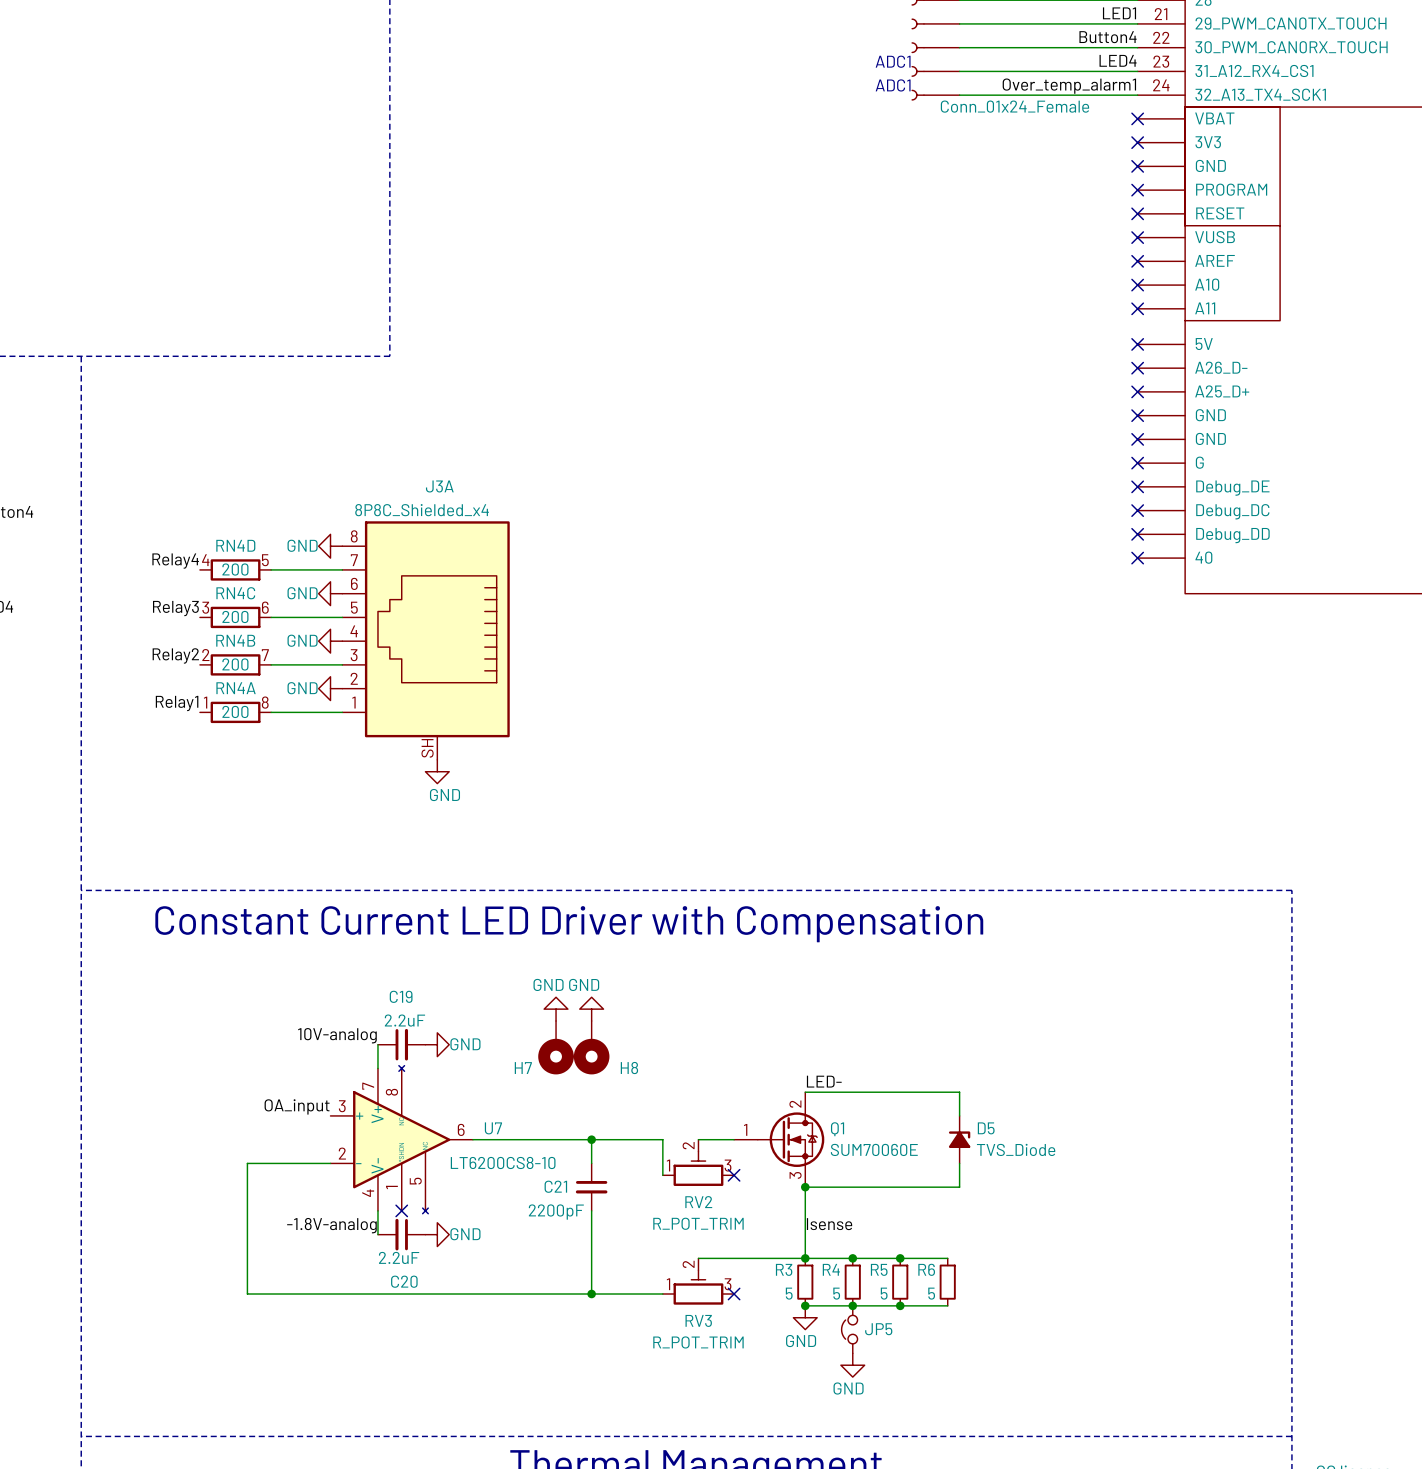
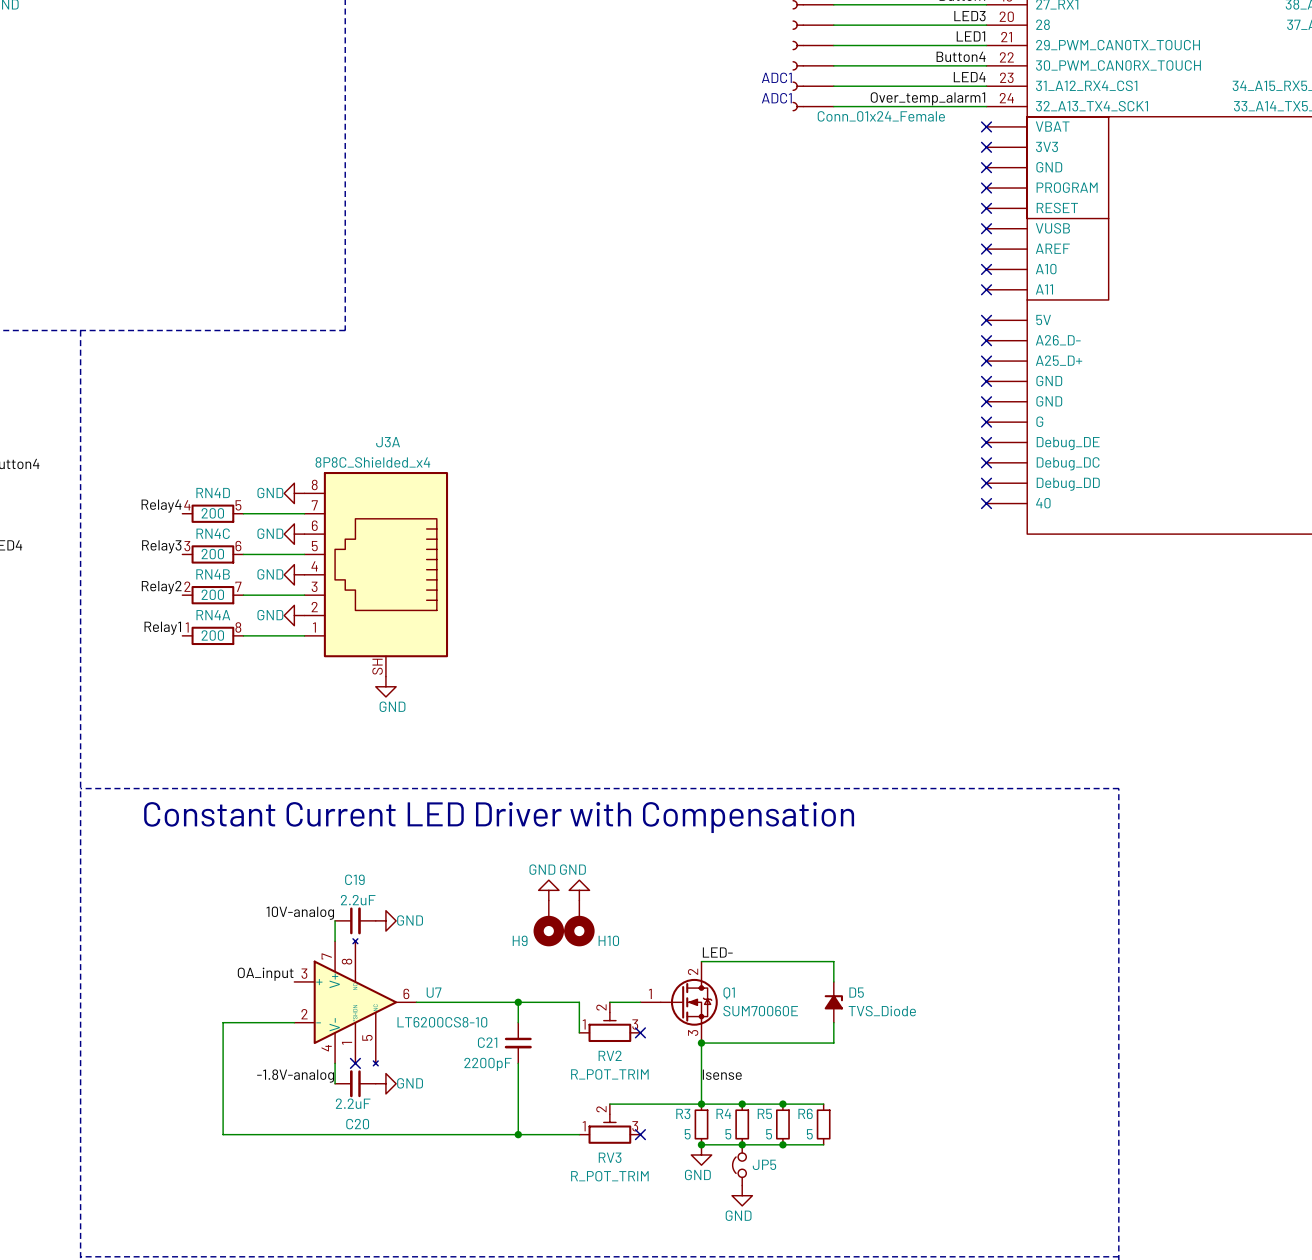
power symbol: GND (556, 1009) -> none
power symbol: GND (591, 1009) -> none
power symbol: none -> GND (548, 890)
power symbol: none -> GND (579, 890)
H7: (556, 1047) -> none
H8: (591, 1047) -> none
H9: none -> (548, 923)
H10: none -> (579, 923)

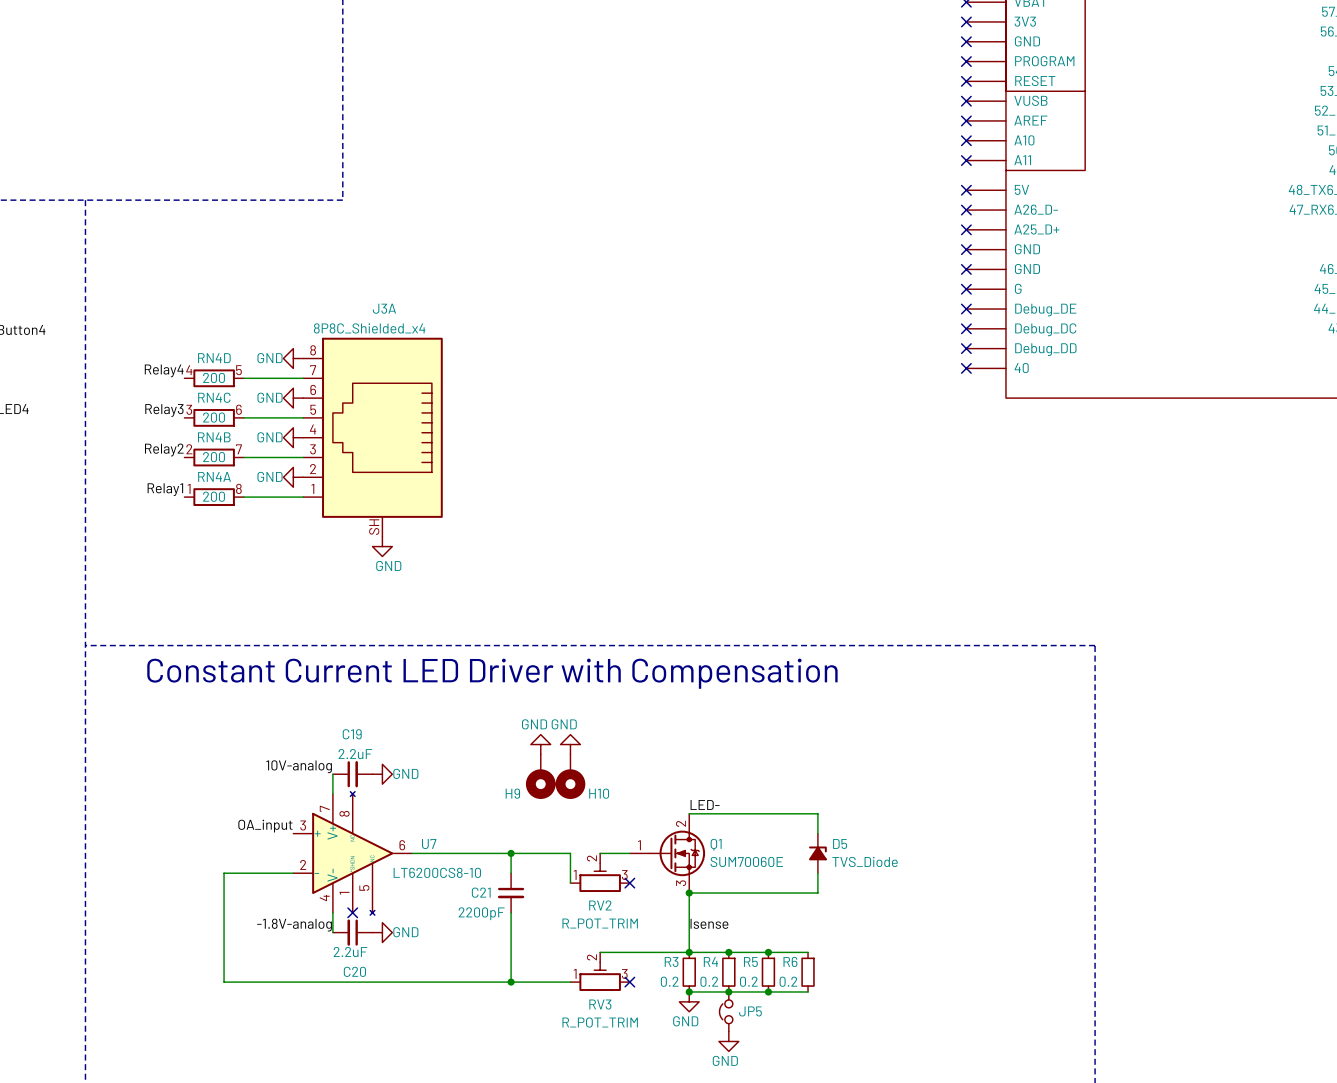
R3 value: 5 (687, 1134) -> 0.2 (669, 981)
R4 value: 5 (728, 1134) -> 0.2 (709, 981)
R5 value: 5 (769, 1134) -> 0.2 (748, 981)
R6 value: 5 (809, 1134) -> 0.2 (788, 981)

